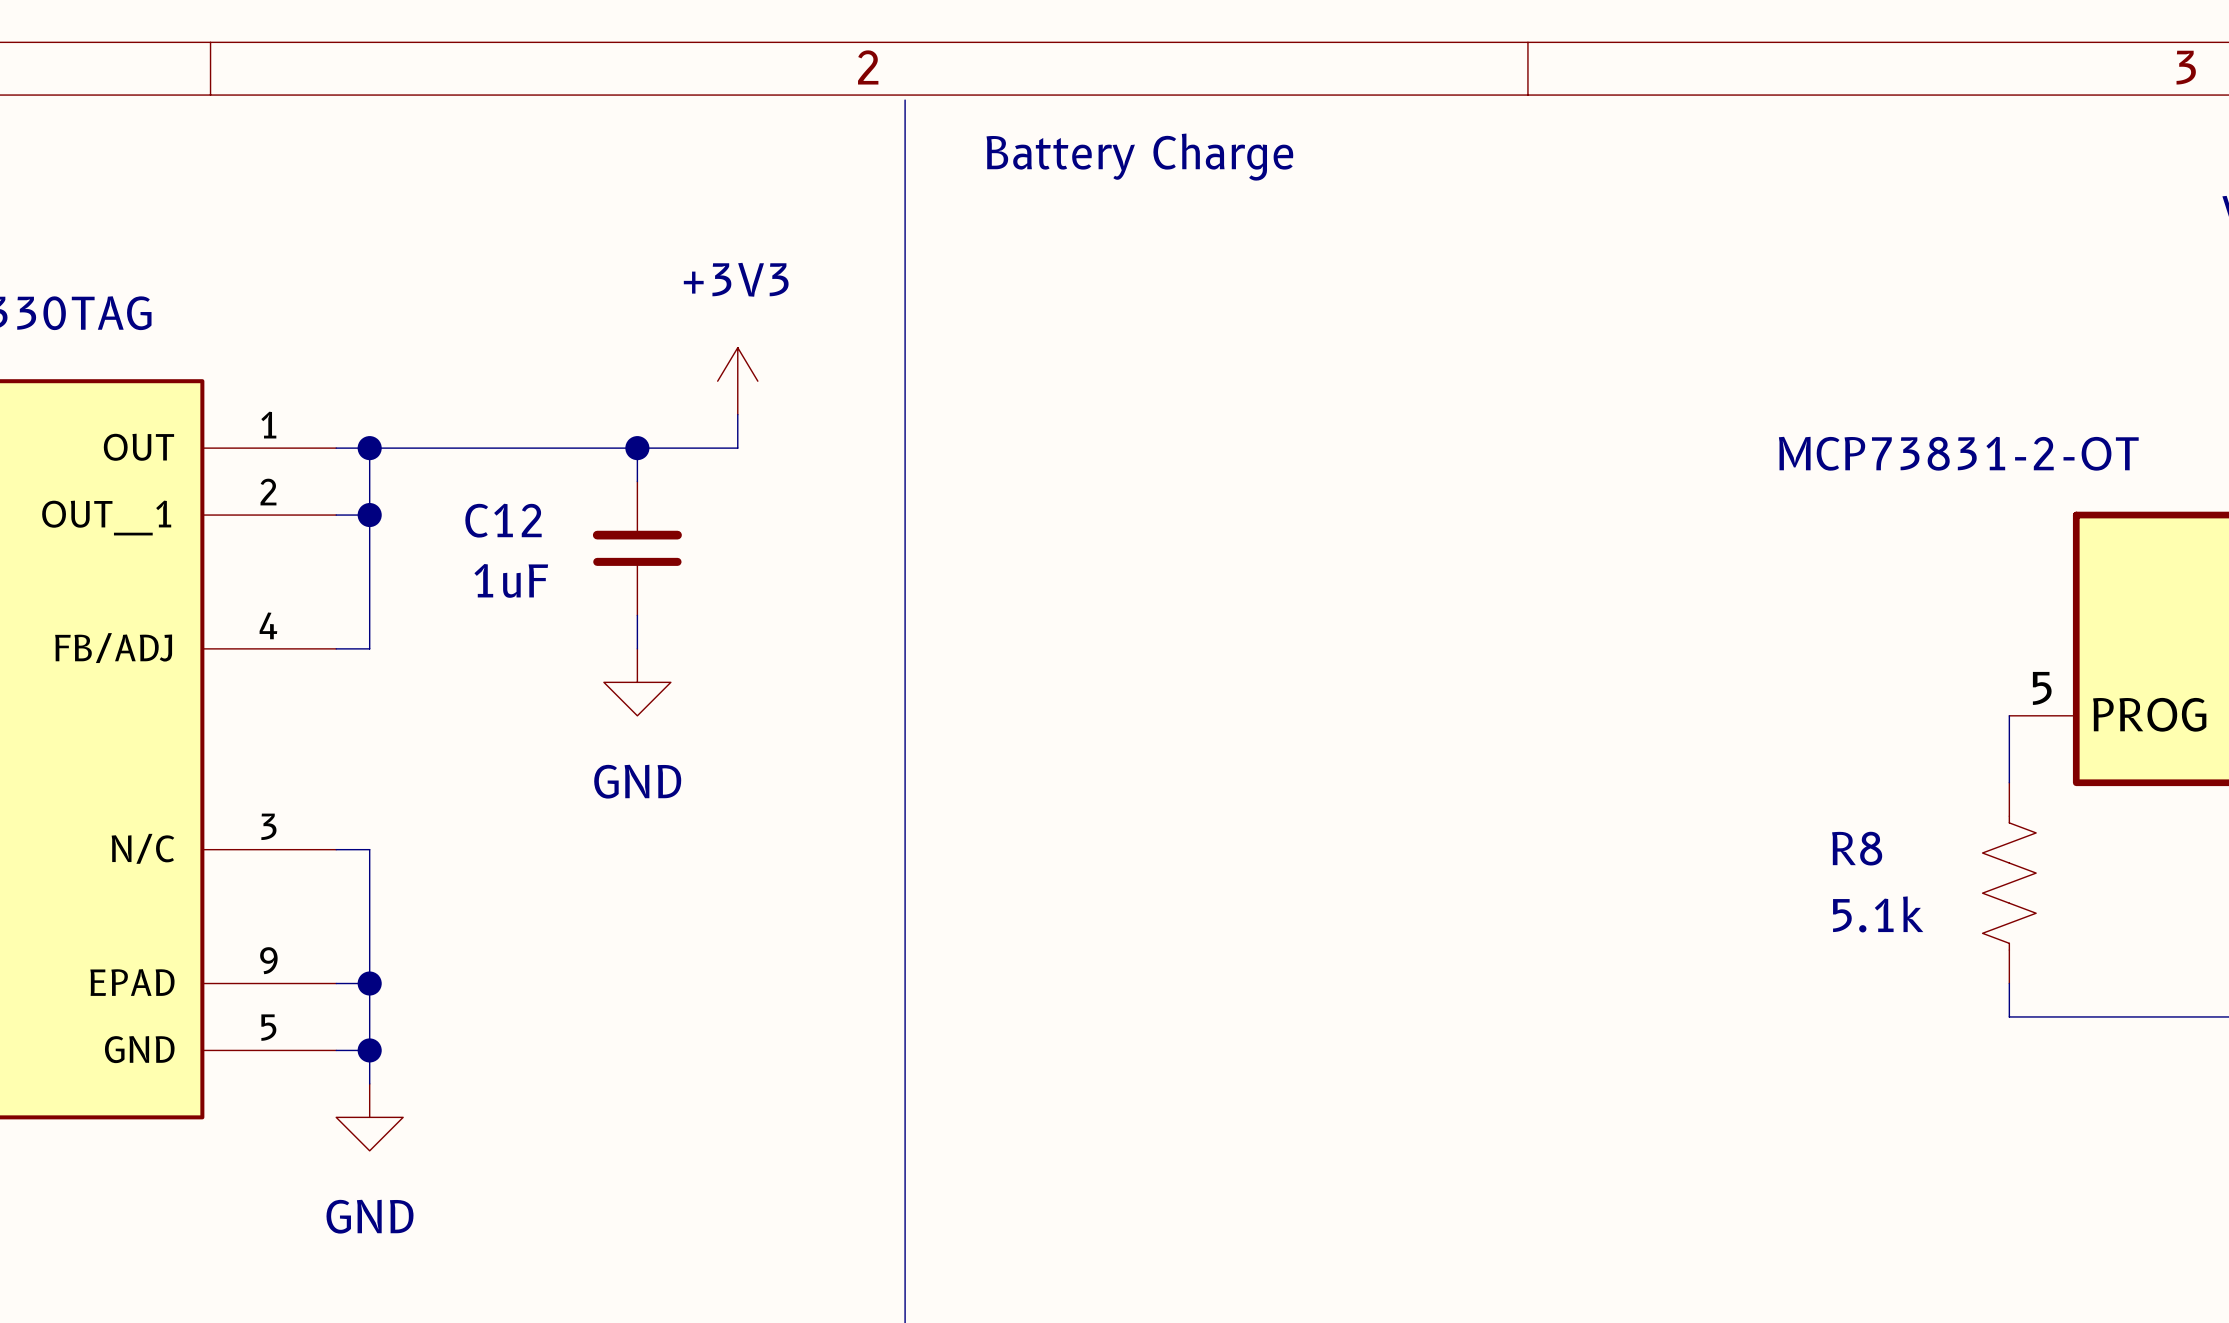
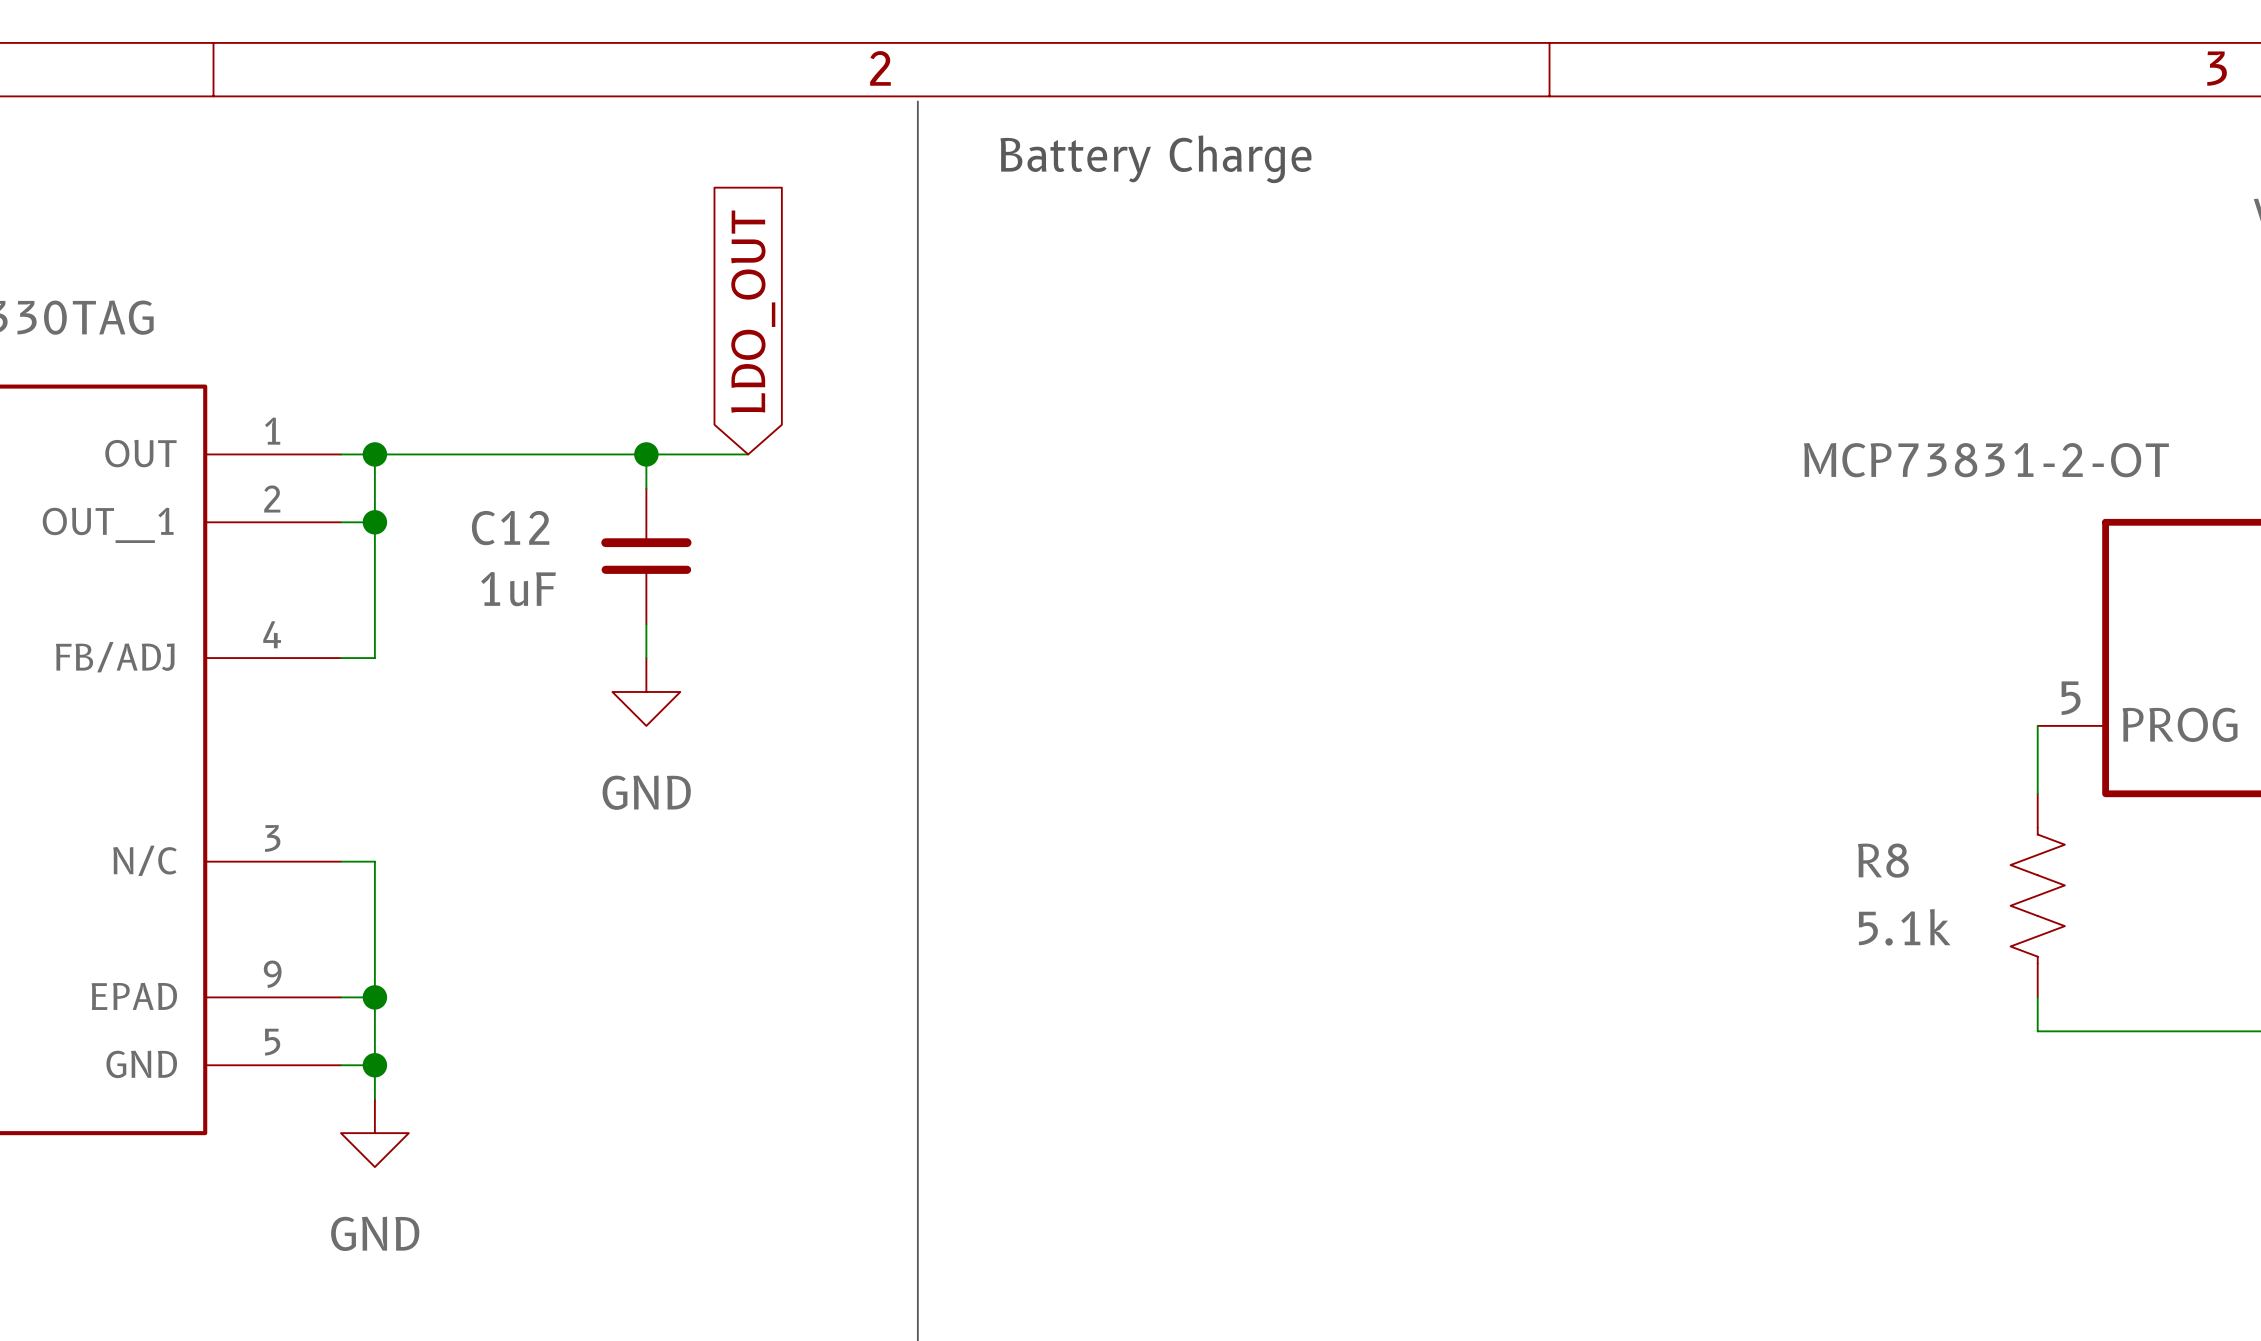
global label: none -> LDO_OUT (753, 311)
power symbol: +3V3 (737, 381) -> none
wire: (737, 414) (737, 448) -> none

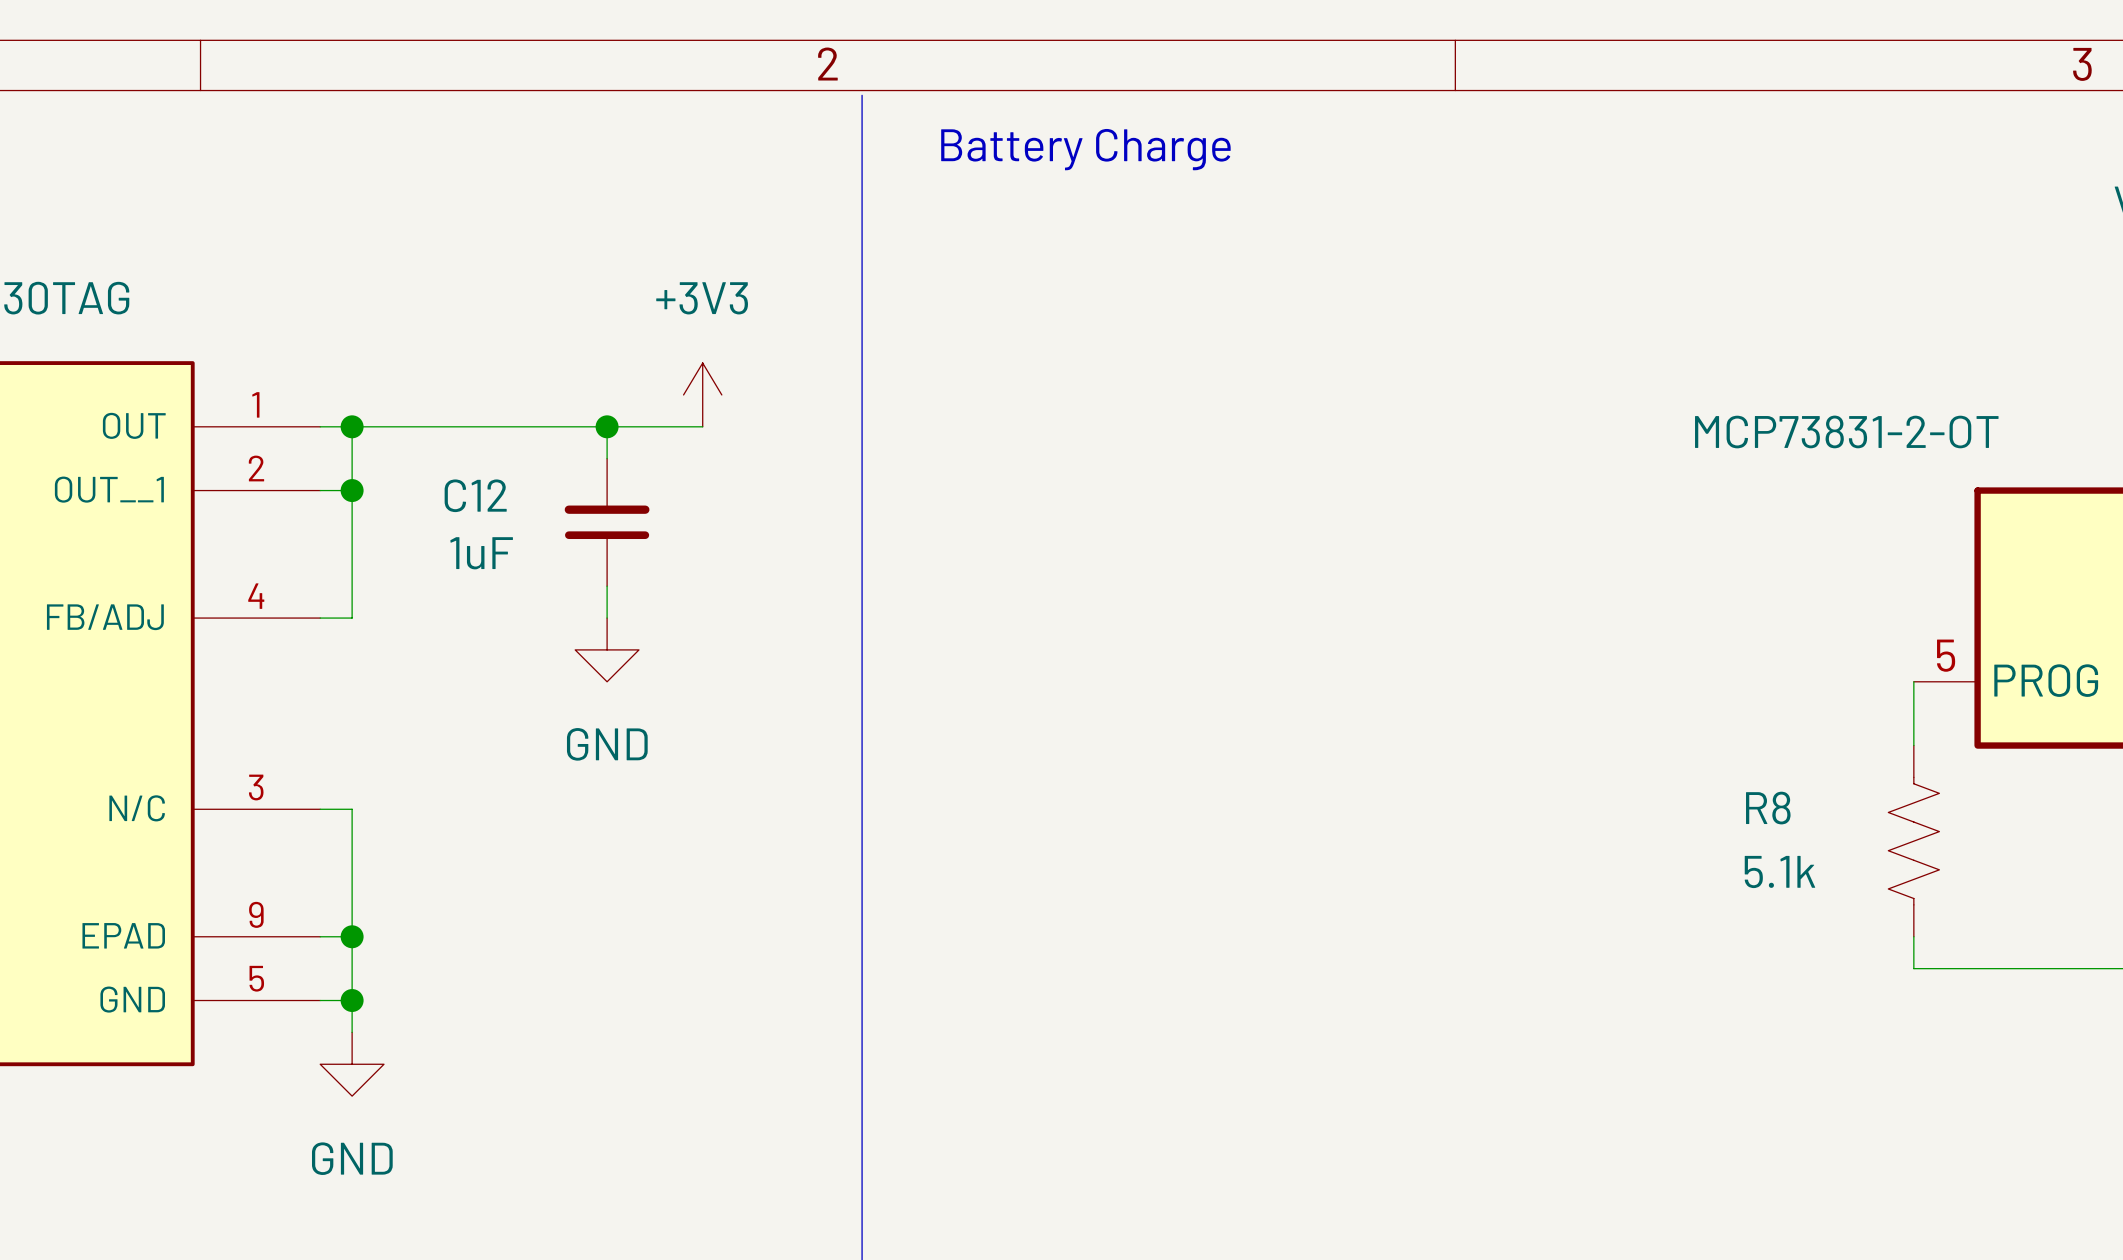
global label: LDO_OUT (753, 311) -> none
power symbol: none -> +3V3 (702, 394)

